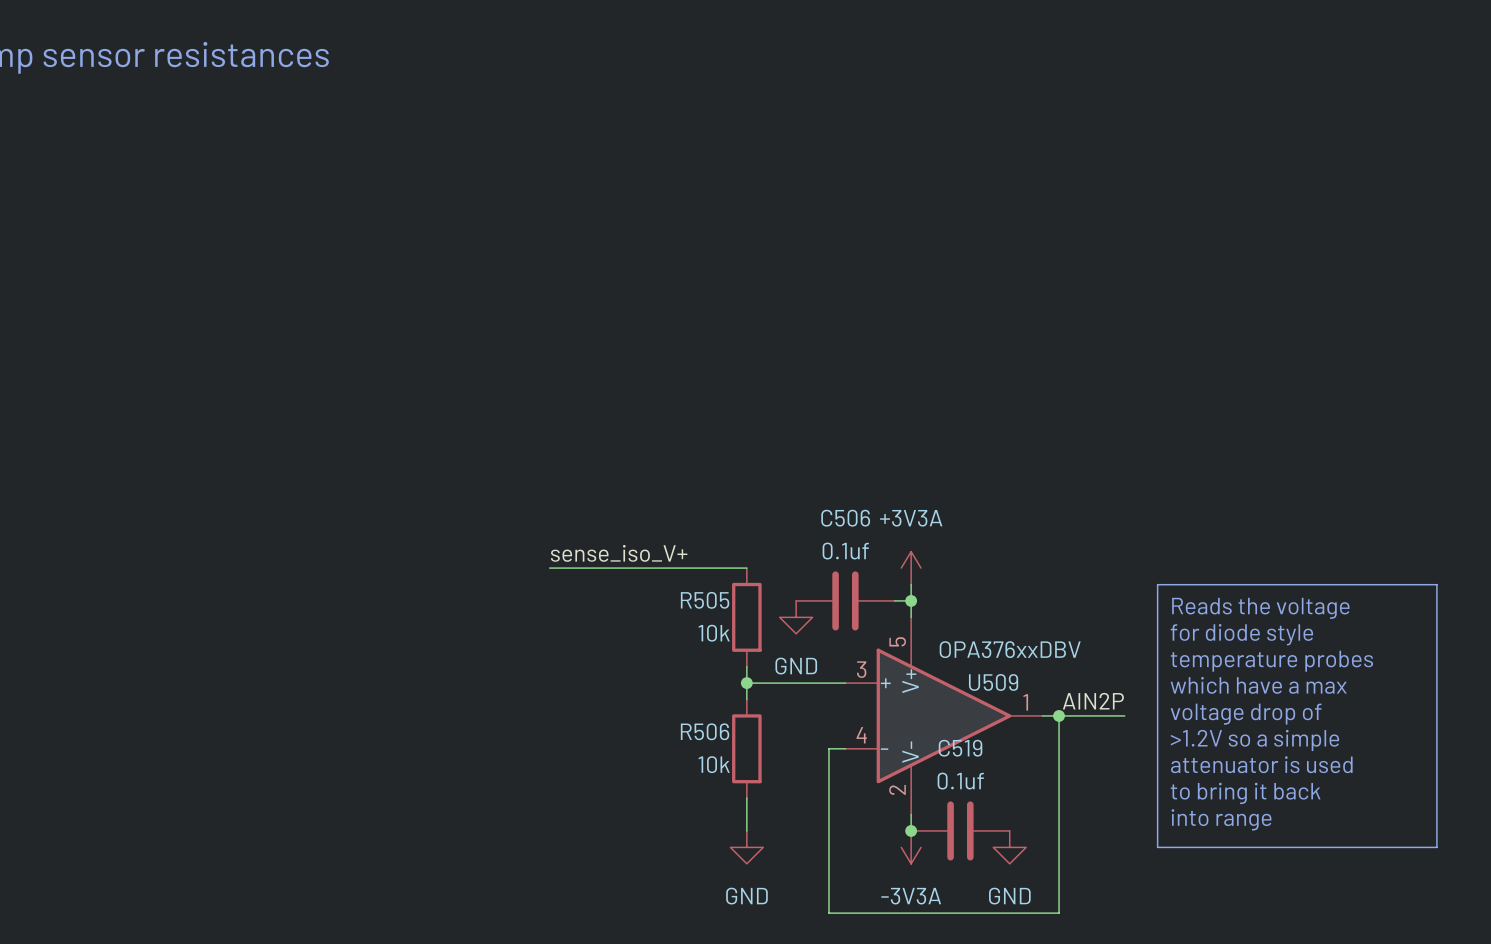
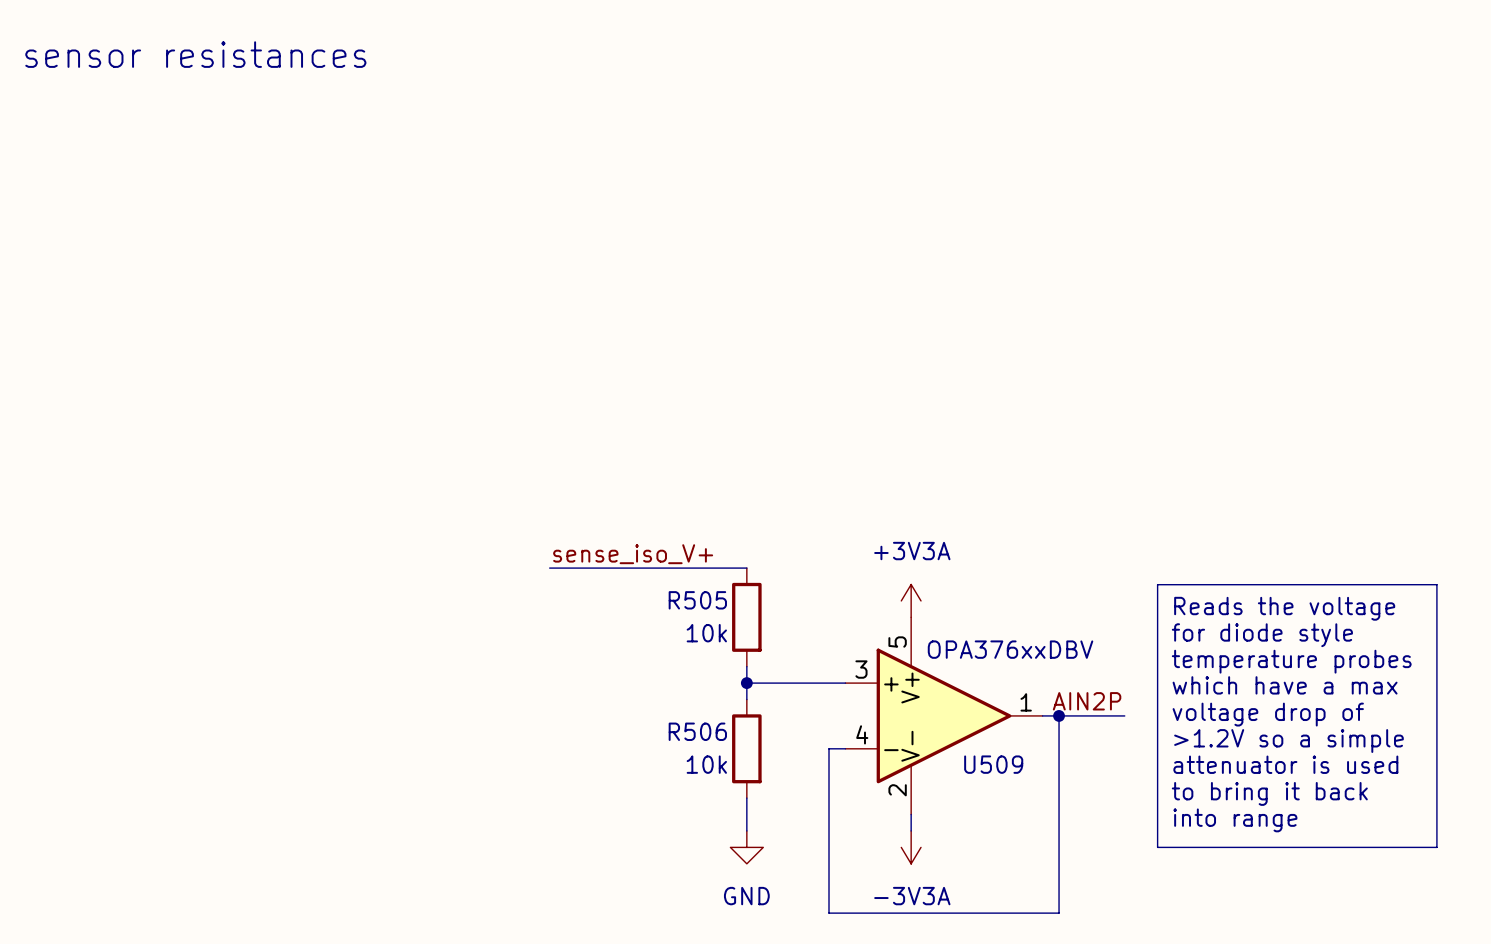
power symbol position: +3V3A (911, 568) -> +3V3A (911, 600)
C506: 0.1uf (845, 600) -> none
wire: (894, 600) (911, 600) -> none
junction: (911, 600) -> none
power symbol: GND (796, 617) -> none
U509 name position: U509 (993, 682) -> U509 (993, 764)
junction: (911, 830) -> none
C519: 0.1uf (960, 830) -> none
power symbol: GND (1009, 847) -> none

